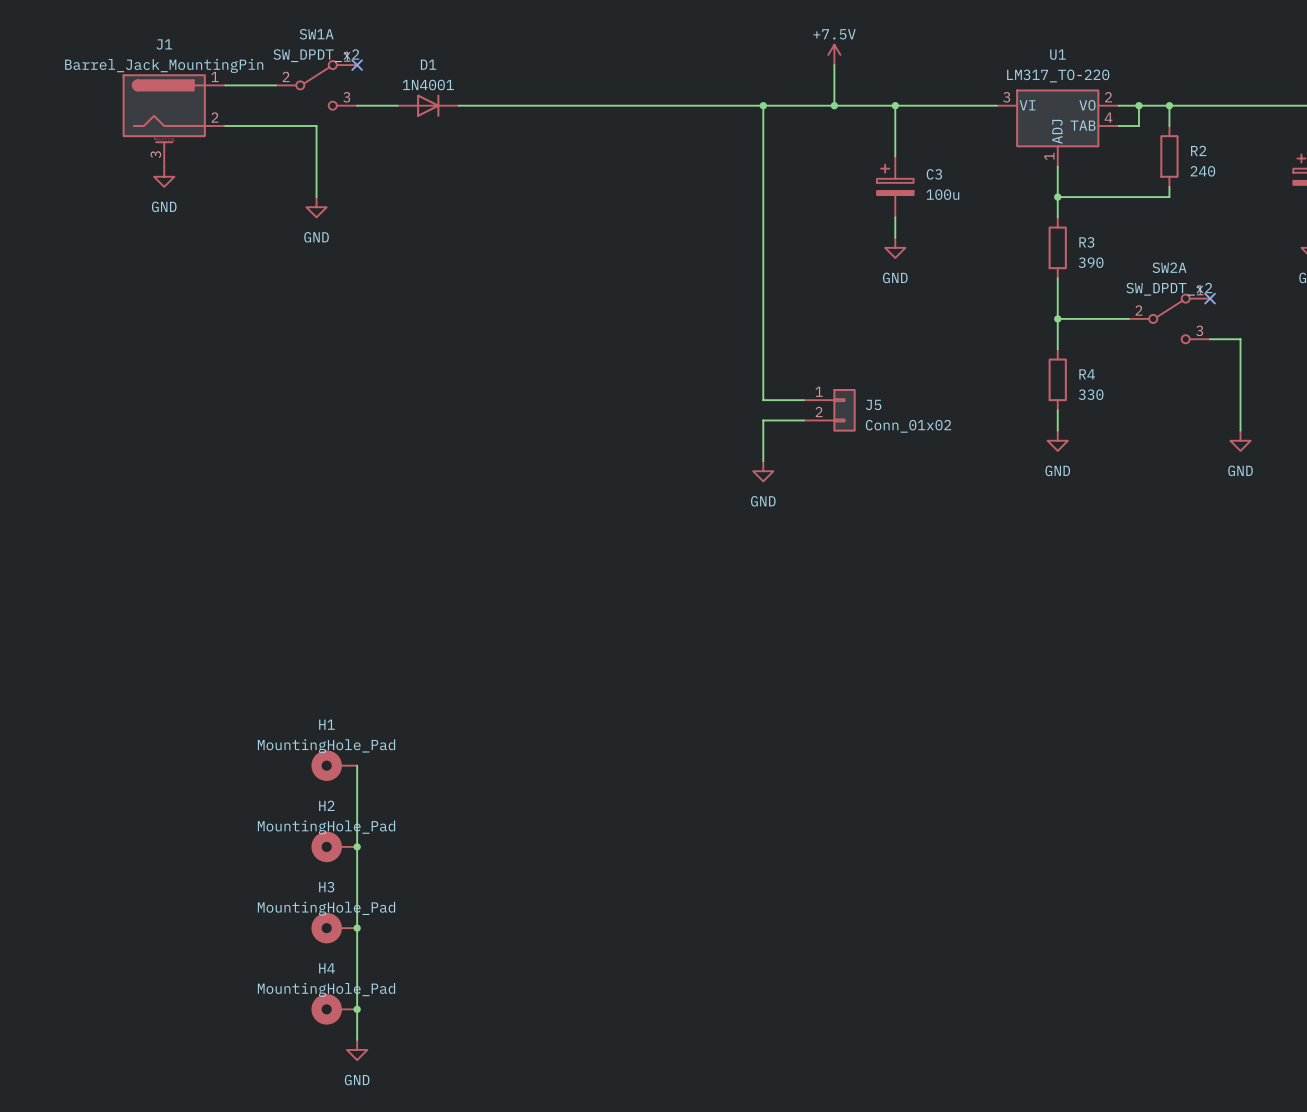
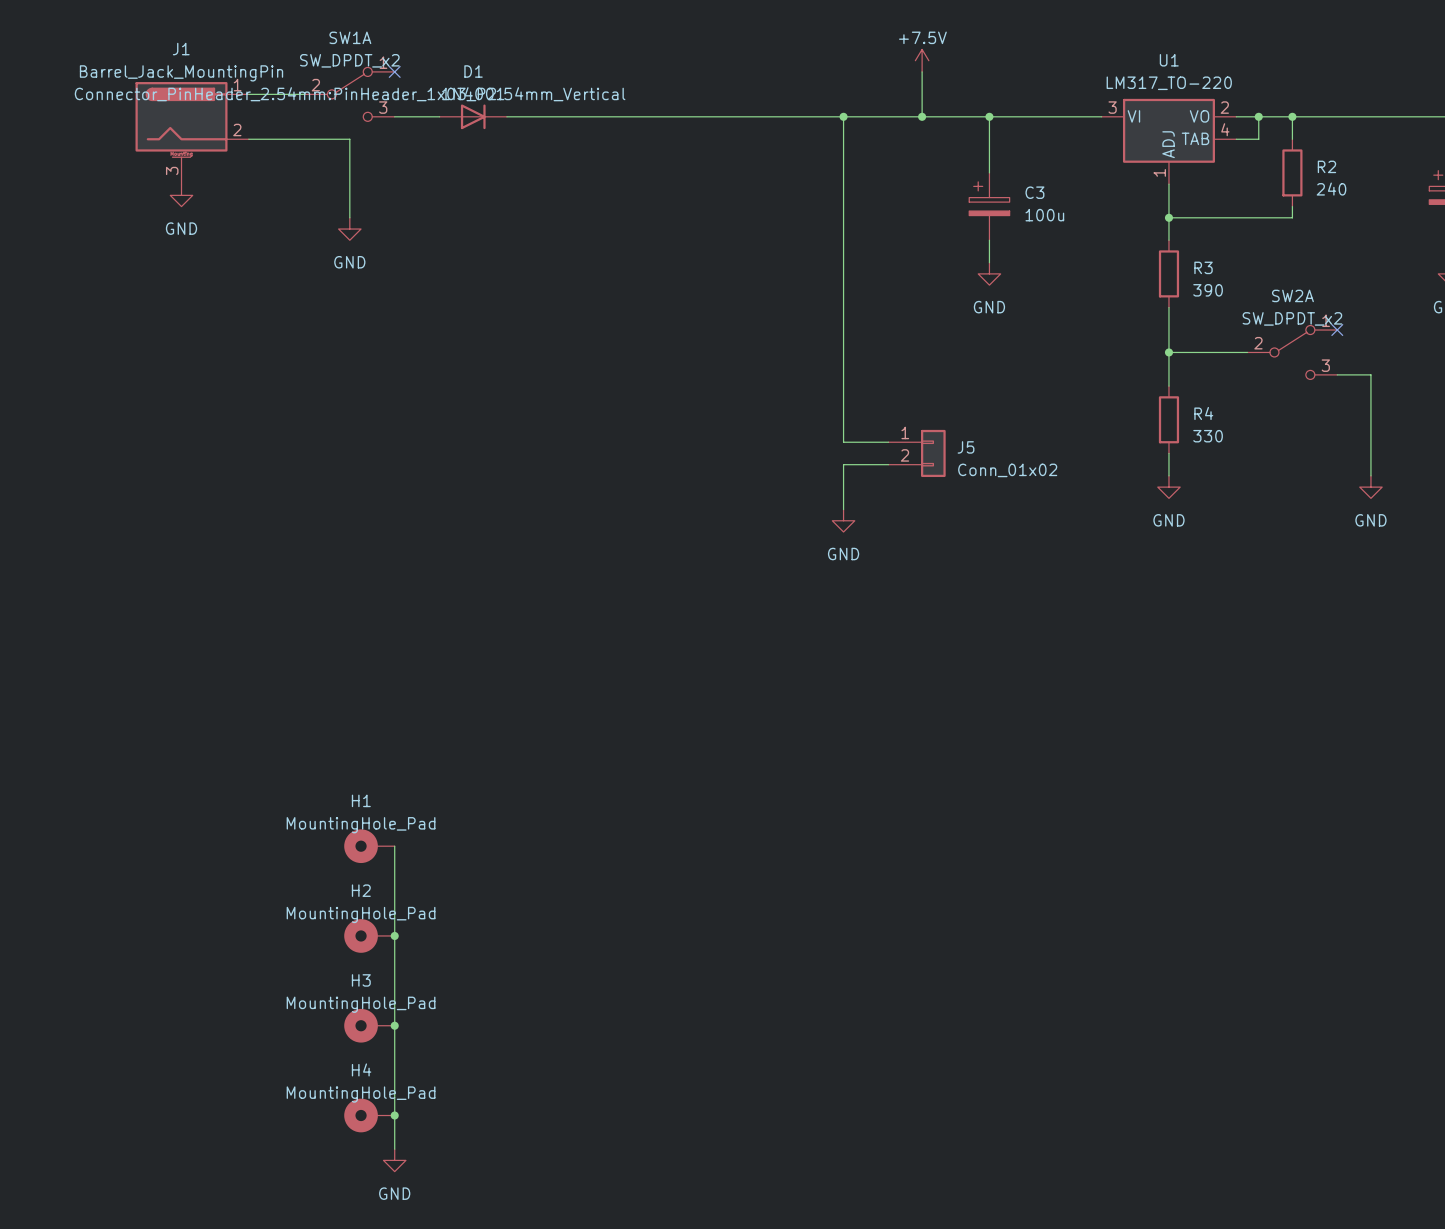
SW1A text: none -> Connector_PinHeader_2.54mm:PinHeader_1x03_P2.54mm_Vertical (350, 94)

